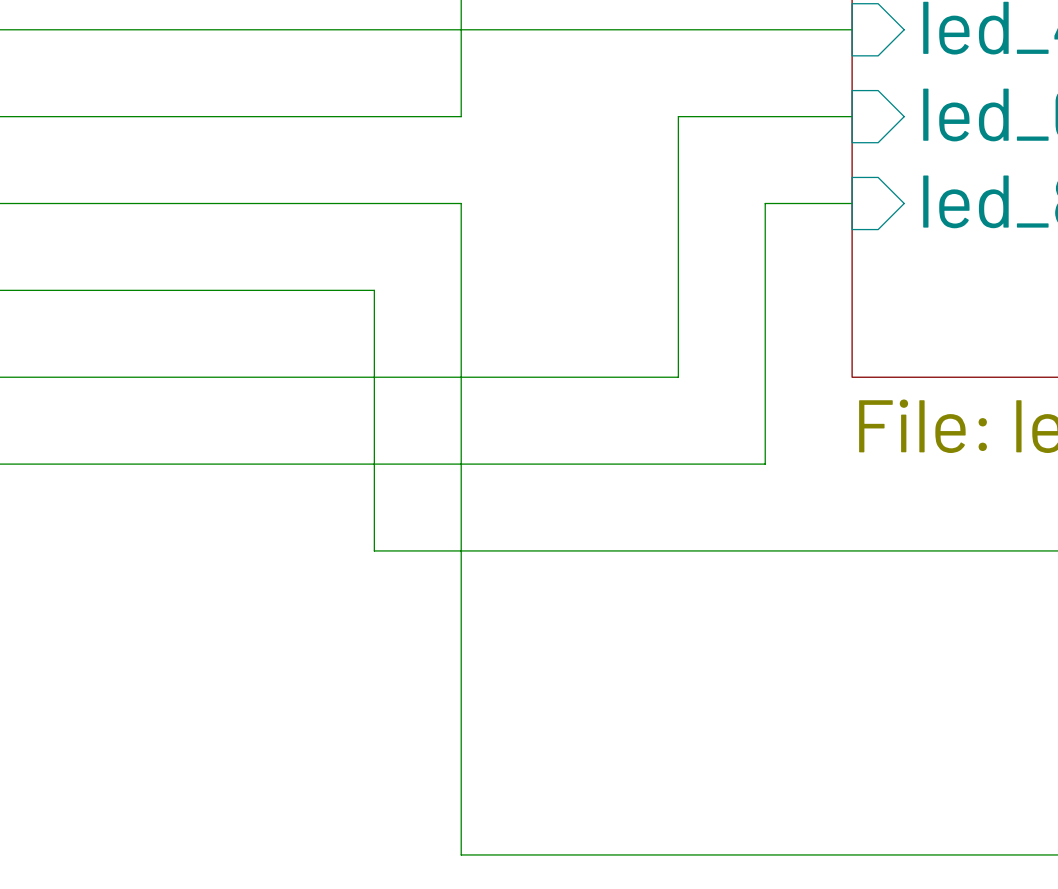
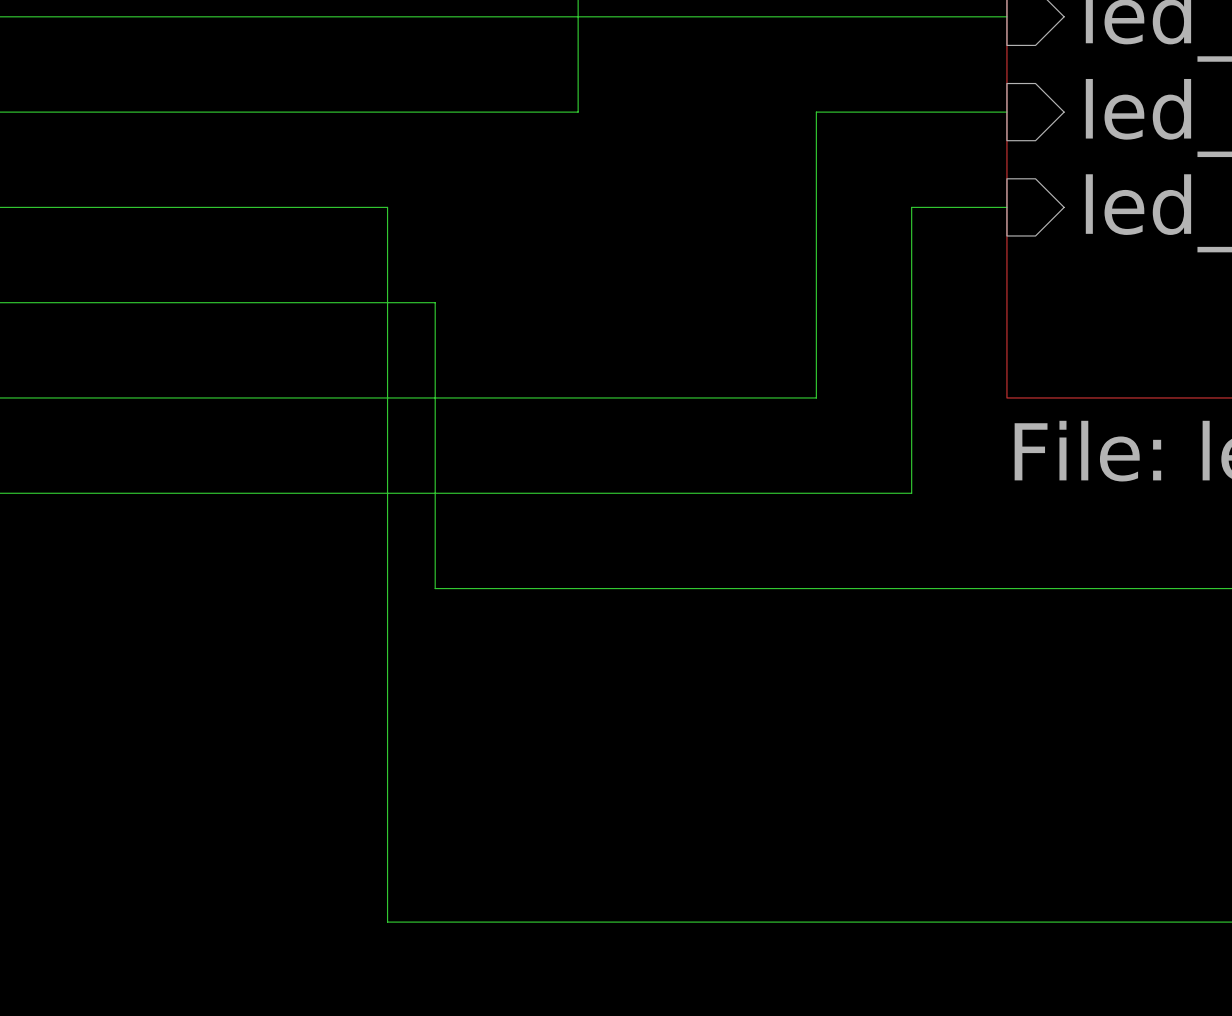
wire: (287, 203) (461, 203) (461, 854) -> (387, 207) (387, 922) (578, 922)
wire: (330, 290) (374, 290) (374, 550) -> (435, 302) (435, 588) (482, 588)

